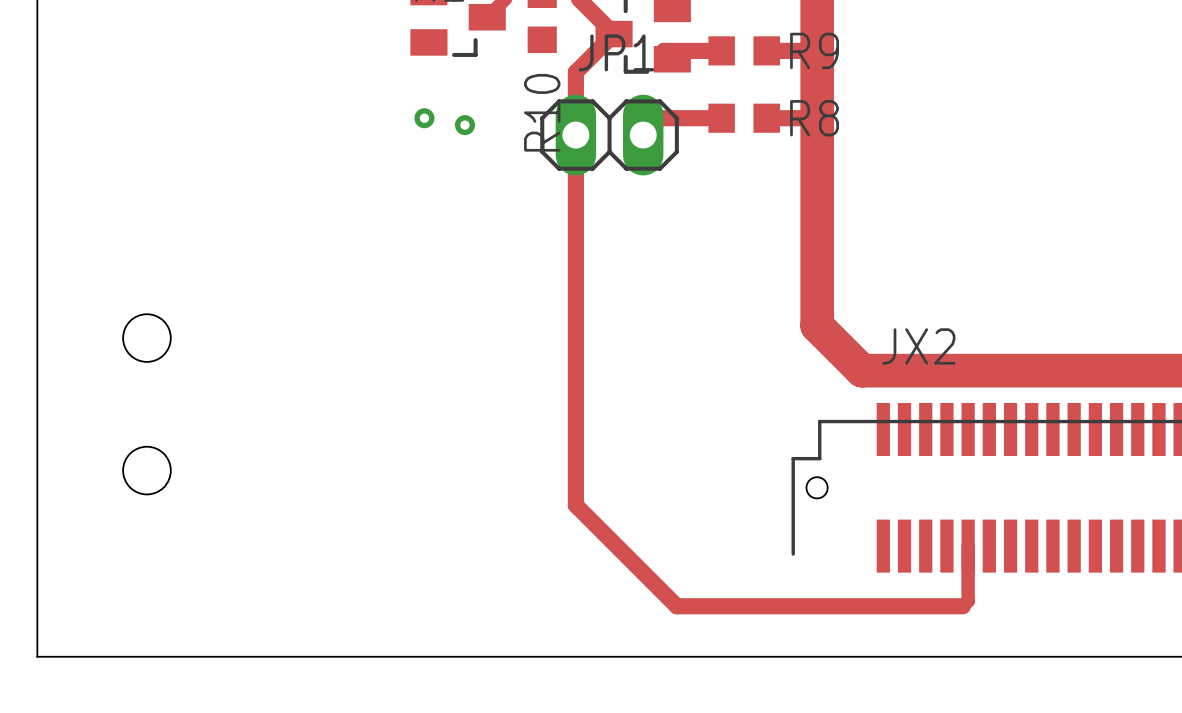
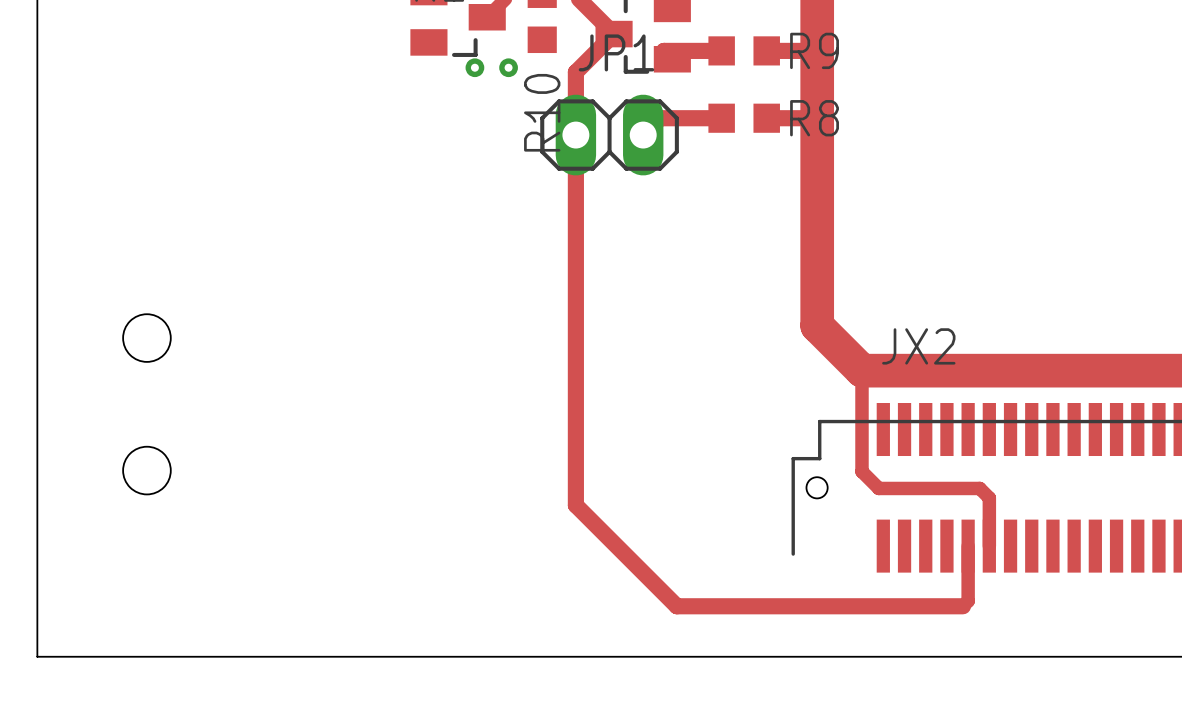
via: none -> (474, 67)
via: none -> (508, 67)
via: (424, 118) -> none
via: (464, 125) -> none
track: none -> (861, 370) (861, 471) (878, 488) (979, 488) (989, 498) (989, 546)

